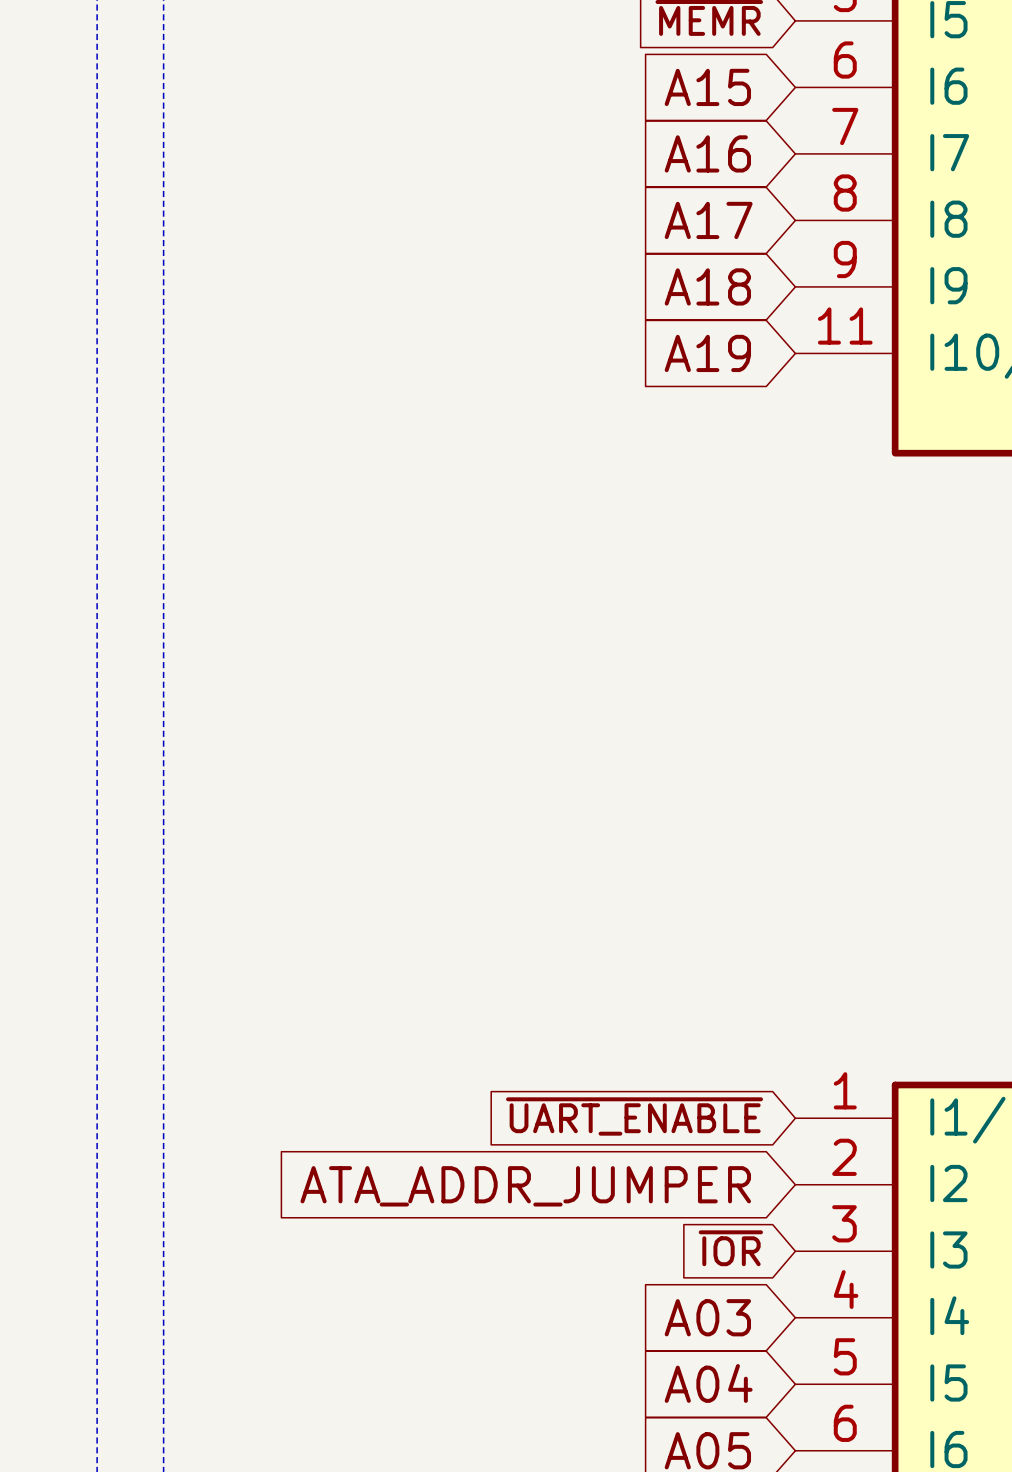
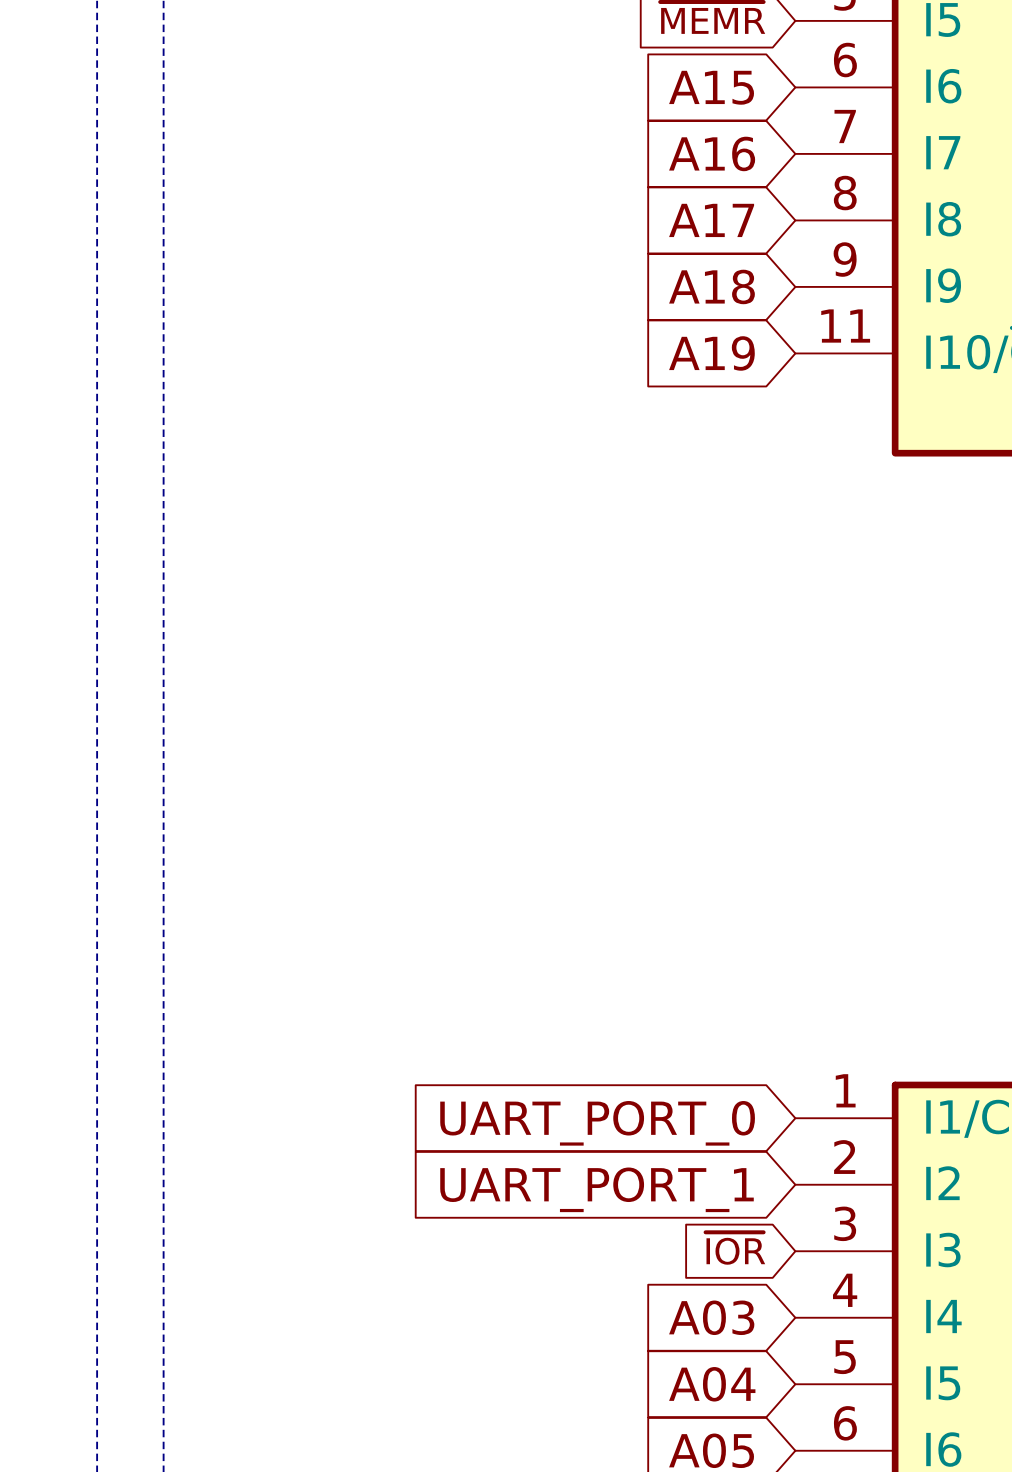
global label: ~{UART_ENABLE} (634, 1116) -> UART_PORT_0 (597, 1123)
global label: ATA_ADDR_JUMPER (525, 1186) -> UART_PORT_1 (597, 1189)

